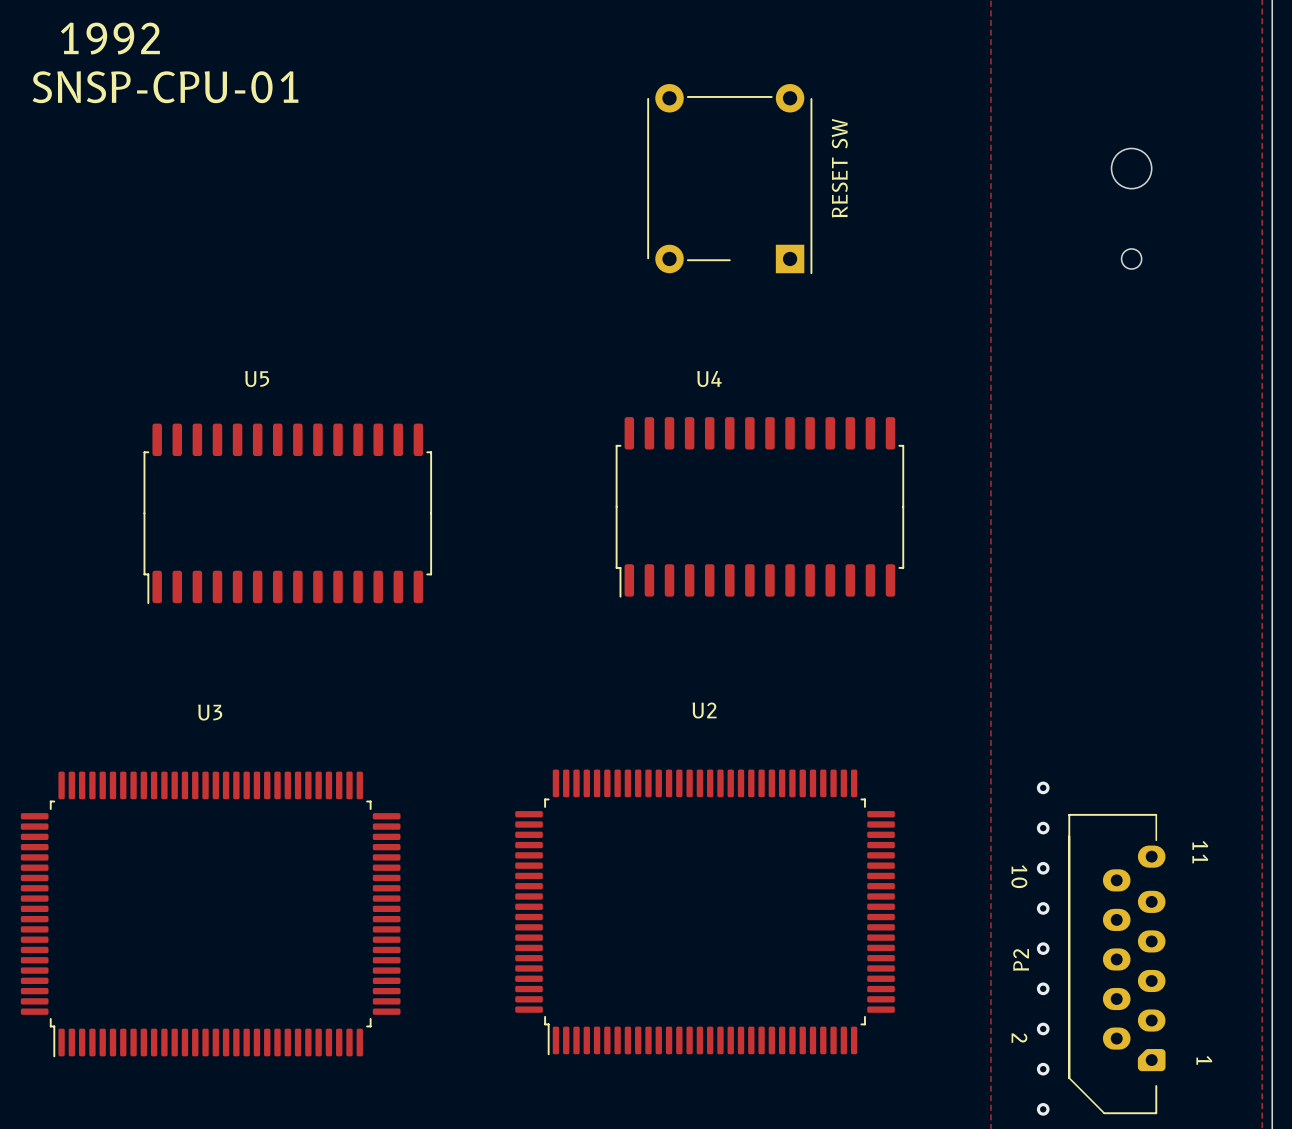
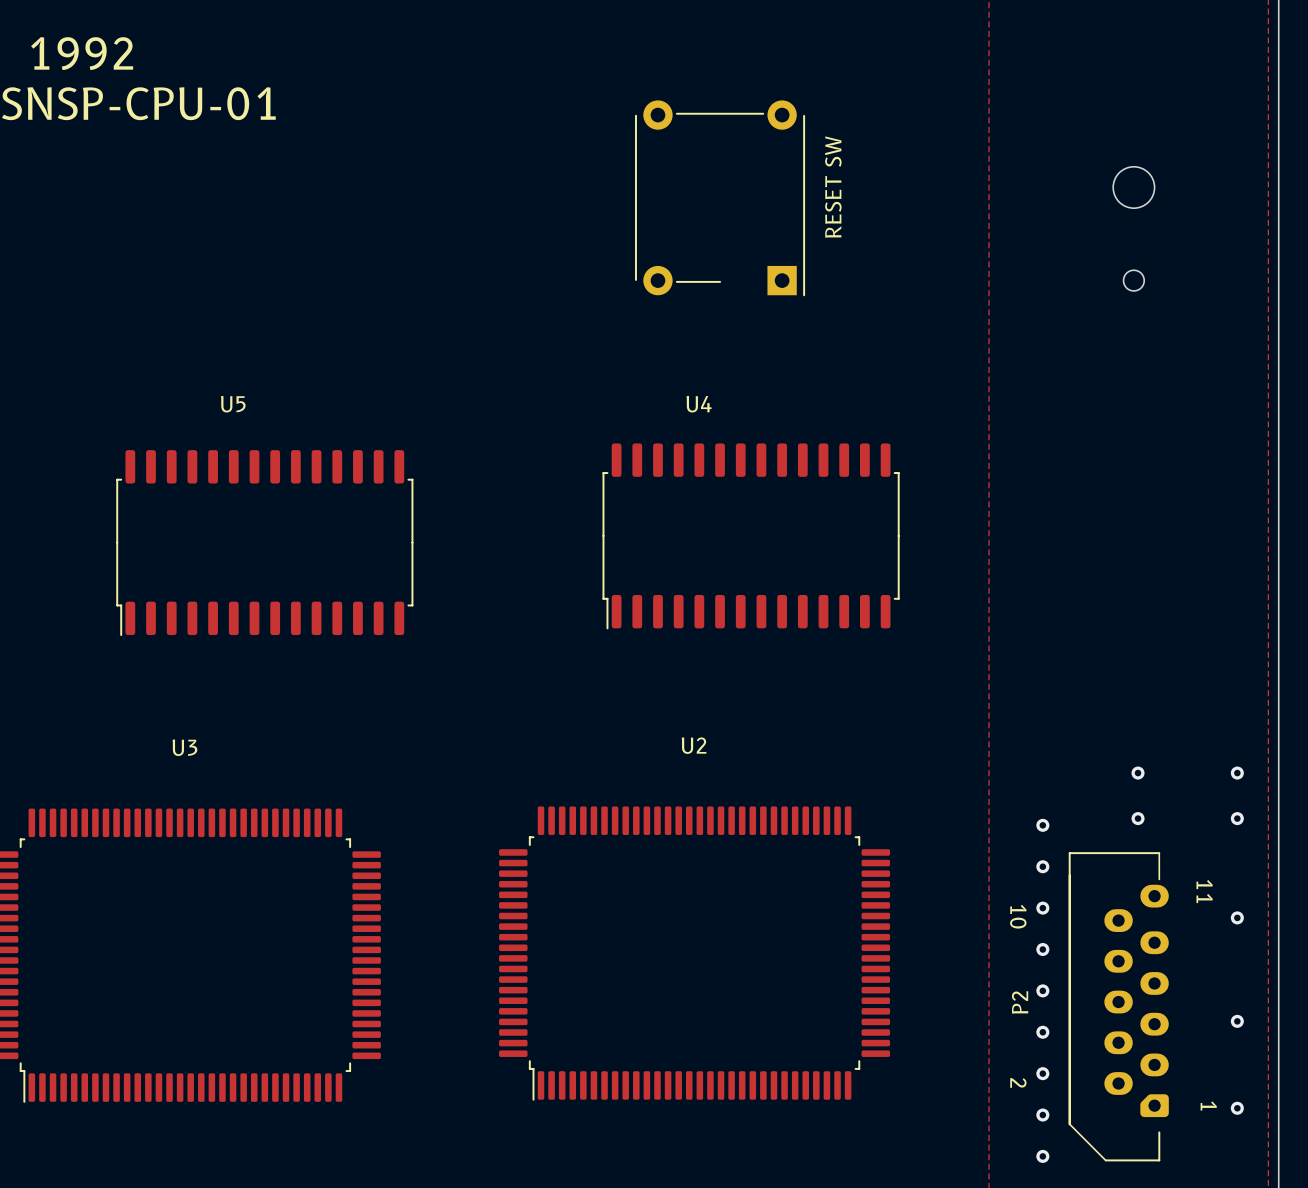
via: none -> (1138, 773)
via: none -> (1237, 773)
via: none -> (1138, 818)
via: none -> (1237, 818)
via: none -> (1237, 917)
via: none -> (1237, 1021)
via: none -> (1237, 1108)

